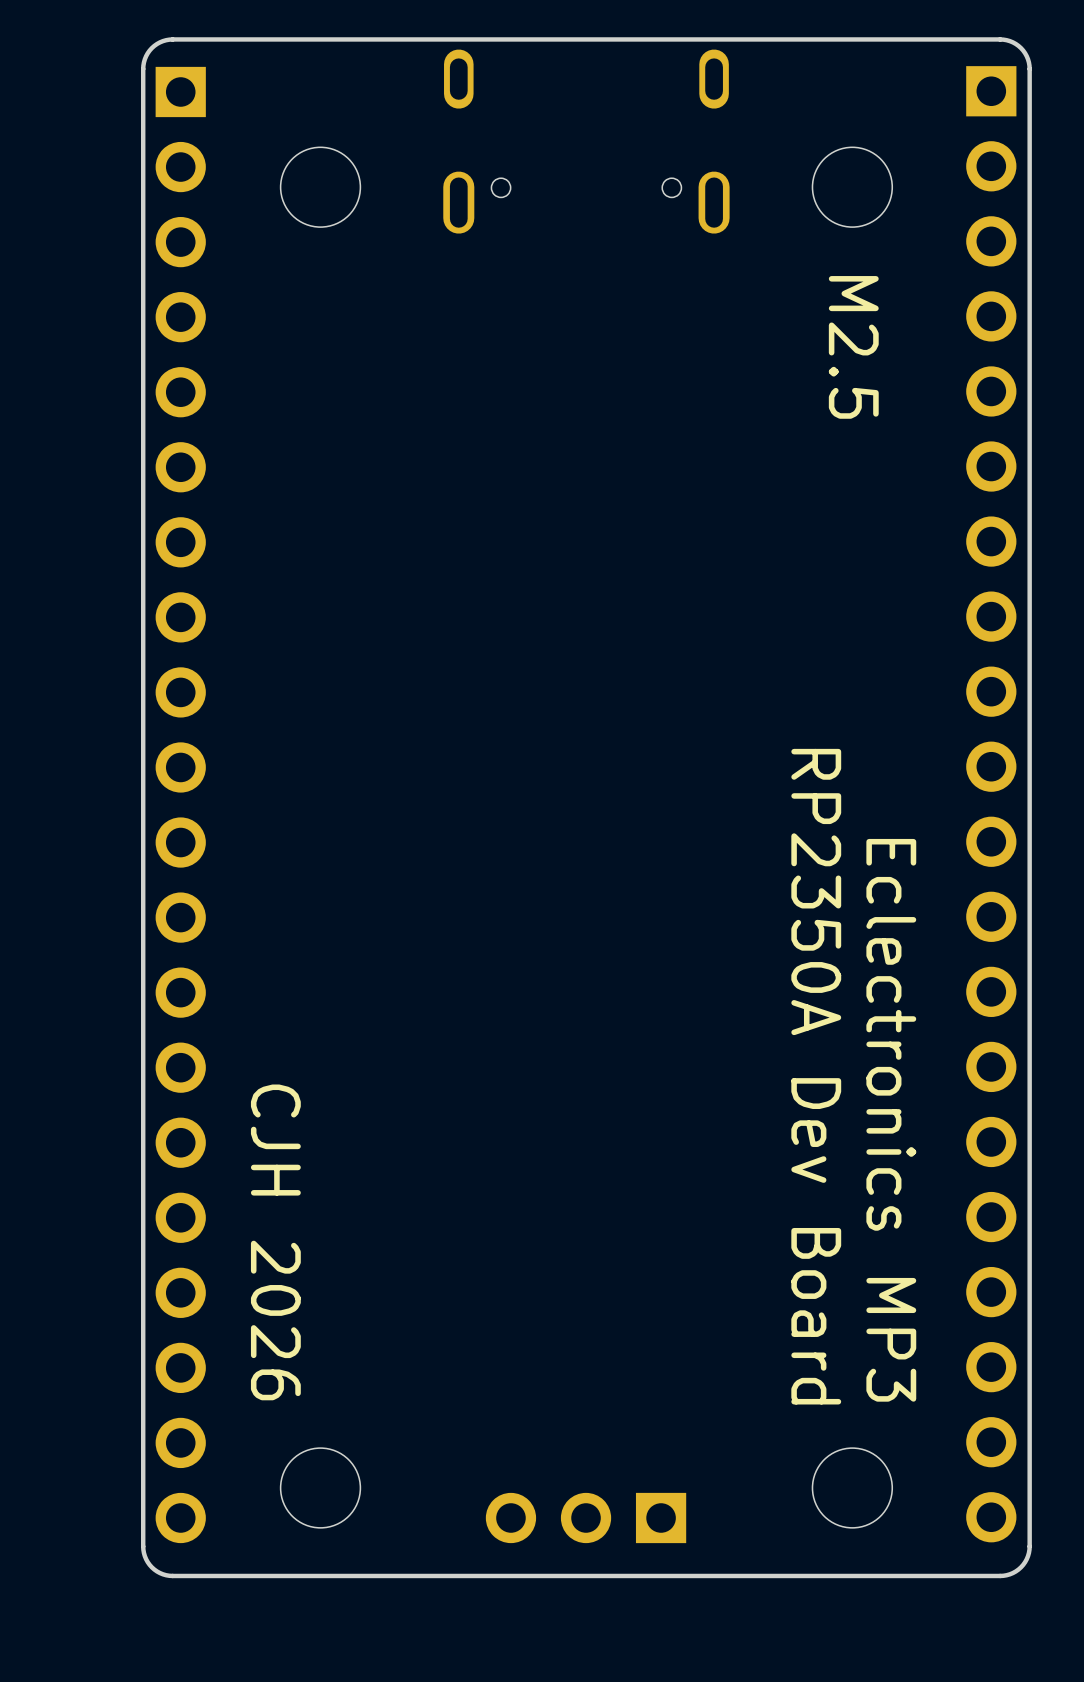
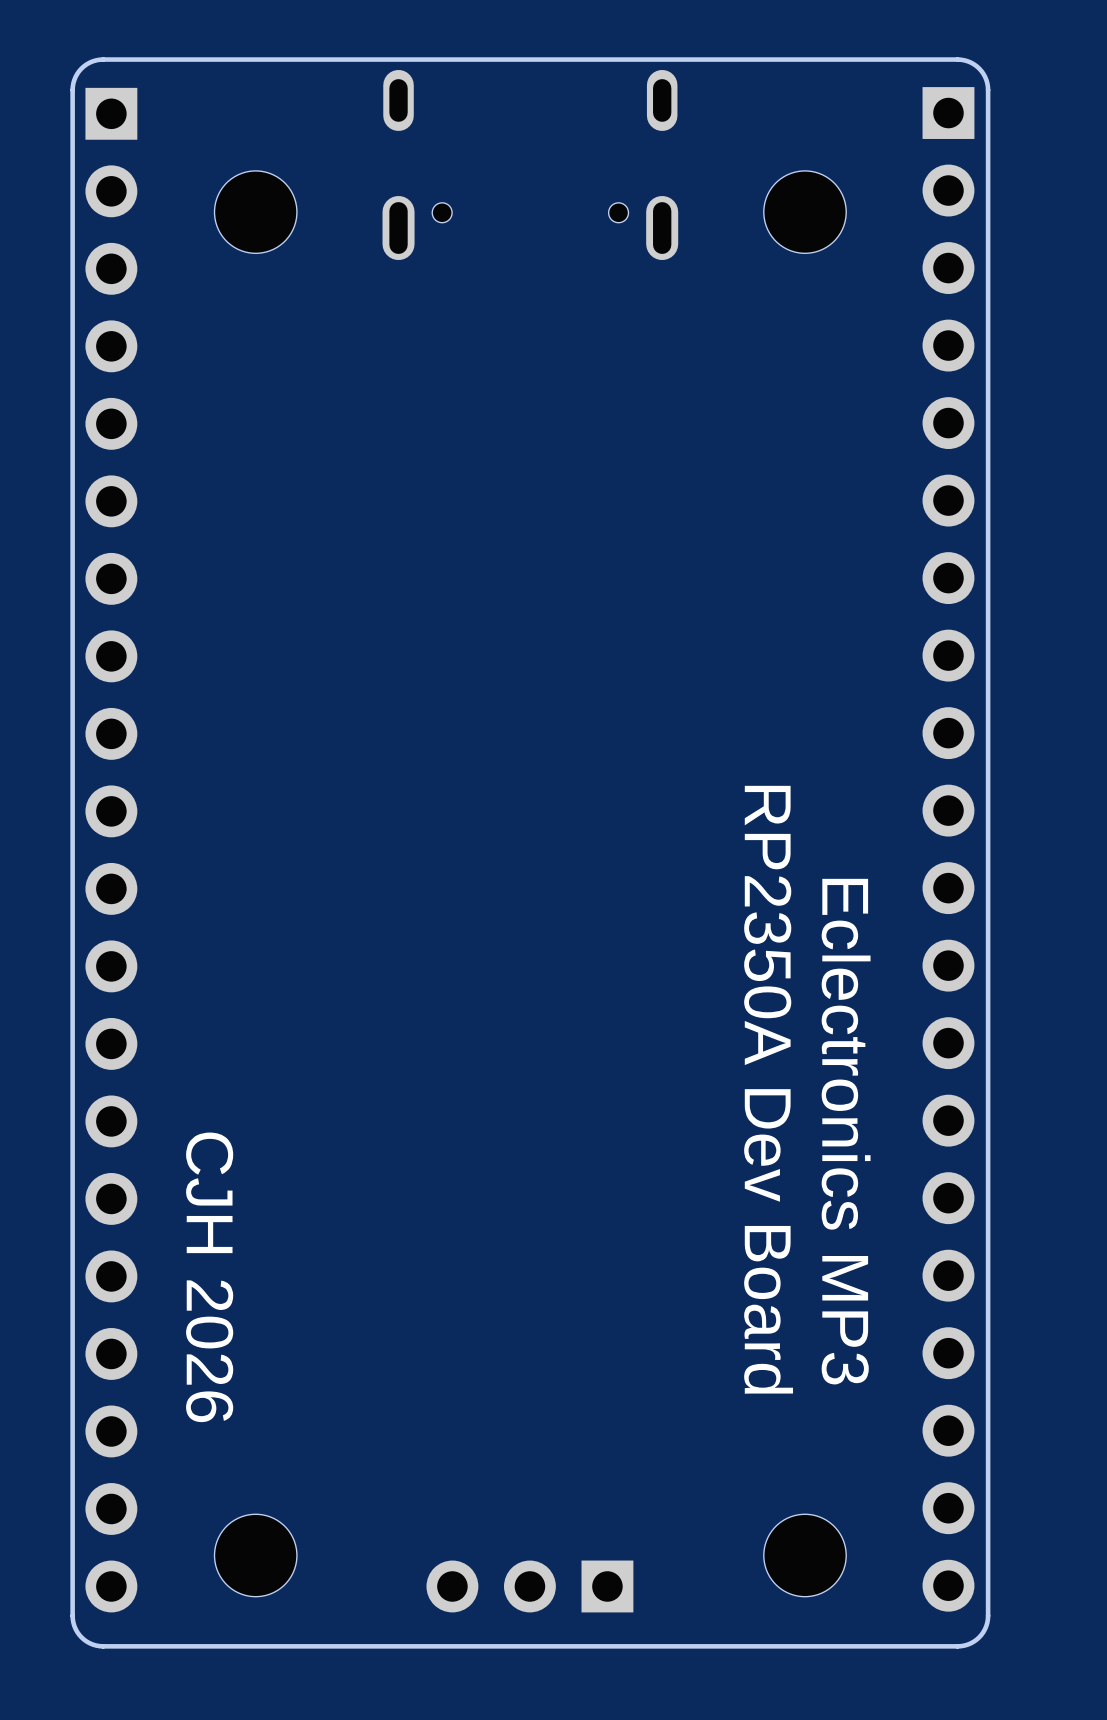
text: M2.5 (853, 347) -> none

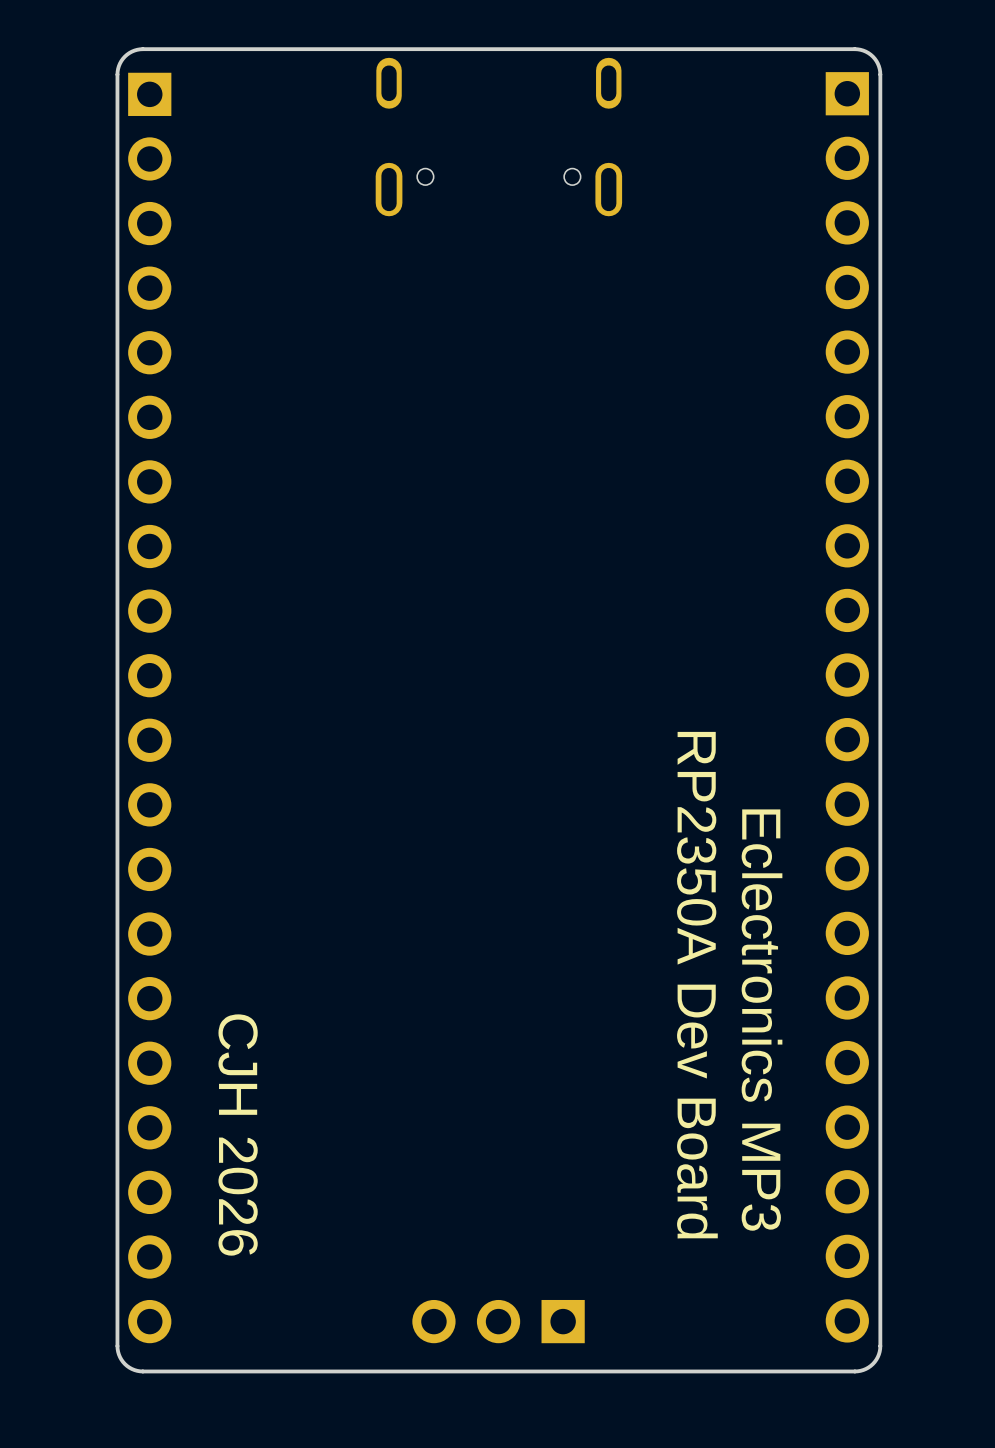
part: (255, 212) -> none
part: (805, 212) -> none
text position: RP2350A Dev Board (768, 1089) -> RP2350A Dev Board (697, 985)
text position: Eclectronics MP3 (846, 1131) -> Eclectronics MP3 (762, 1020)
text position: CJH 2026 (209, 1277) -> CJH 2026 (238, 1135)
part: (255, 1555) -> none
part: (805, 1555) -> none

